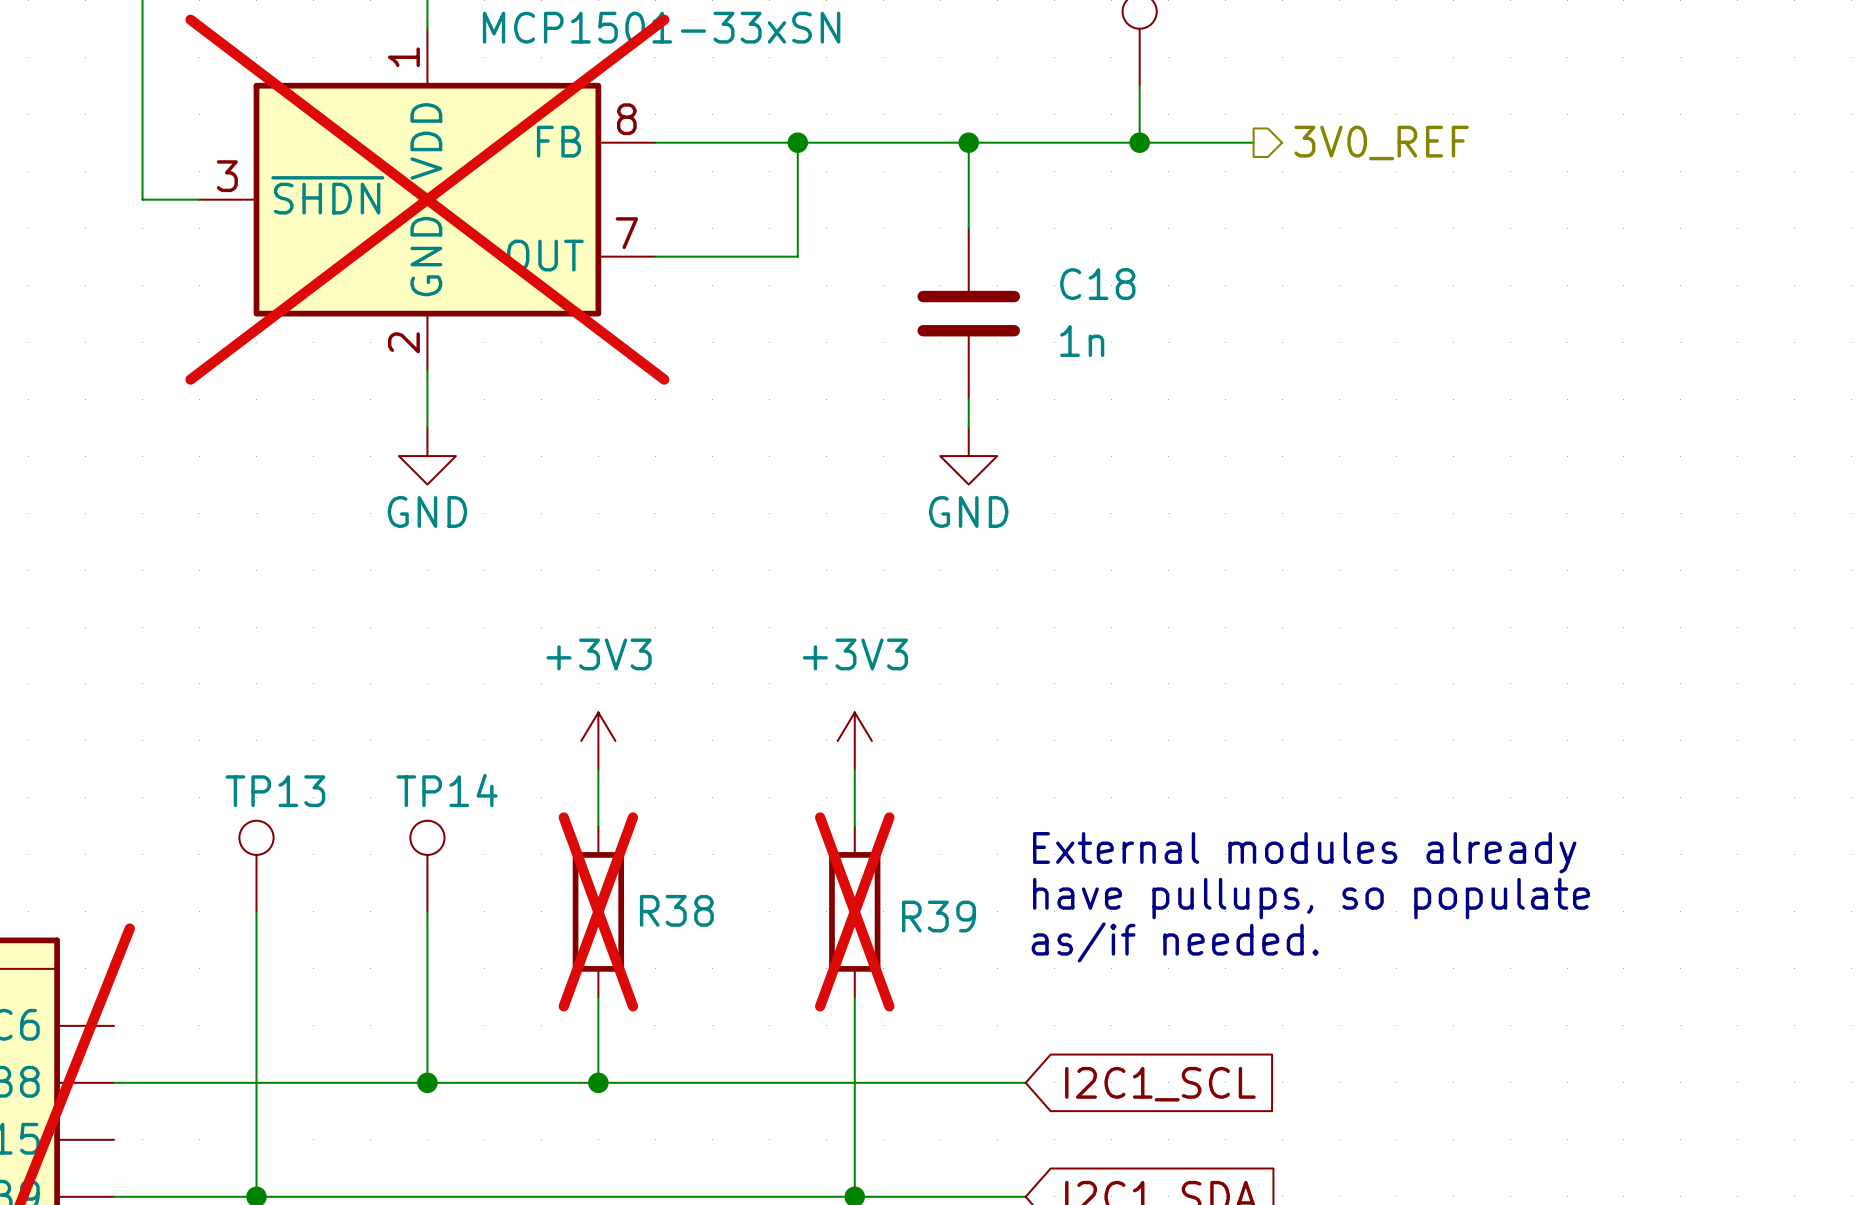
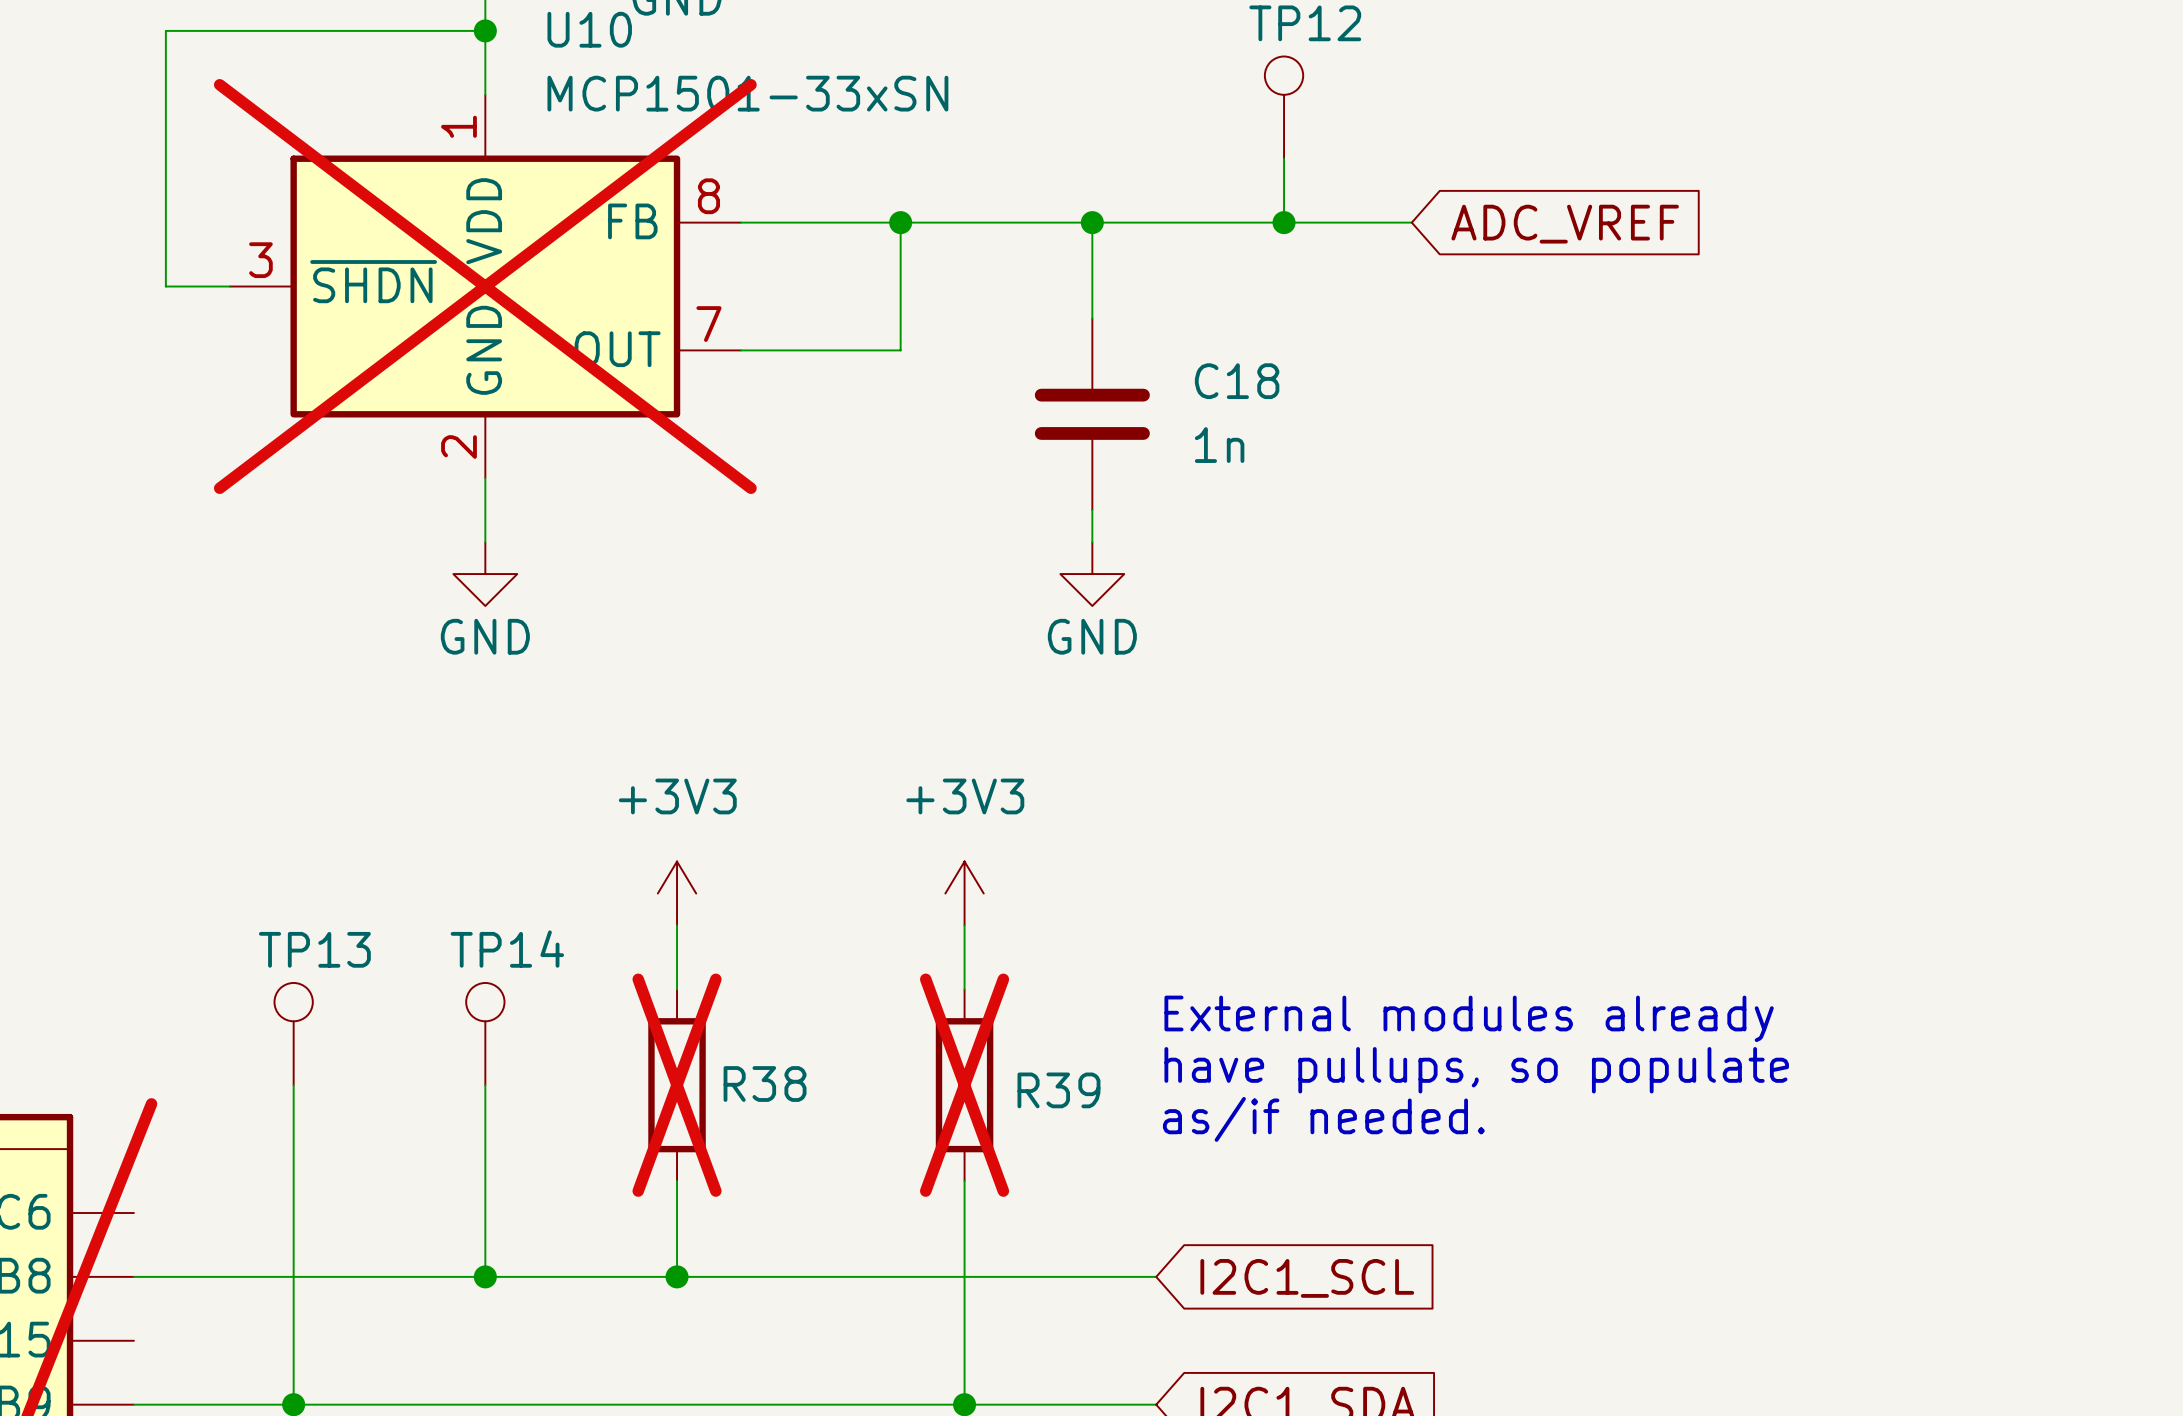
hierarchical label: 3V0_REF (1381, 142) -> none
global label: none -> ADC_VREF (1565, 224)

